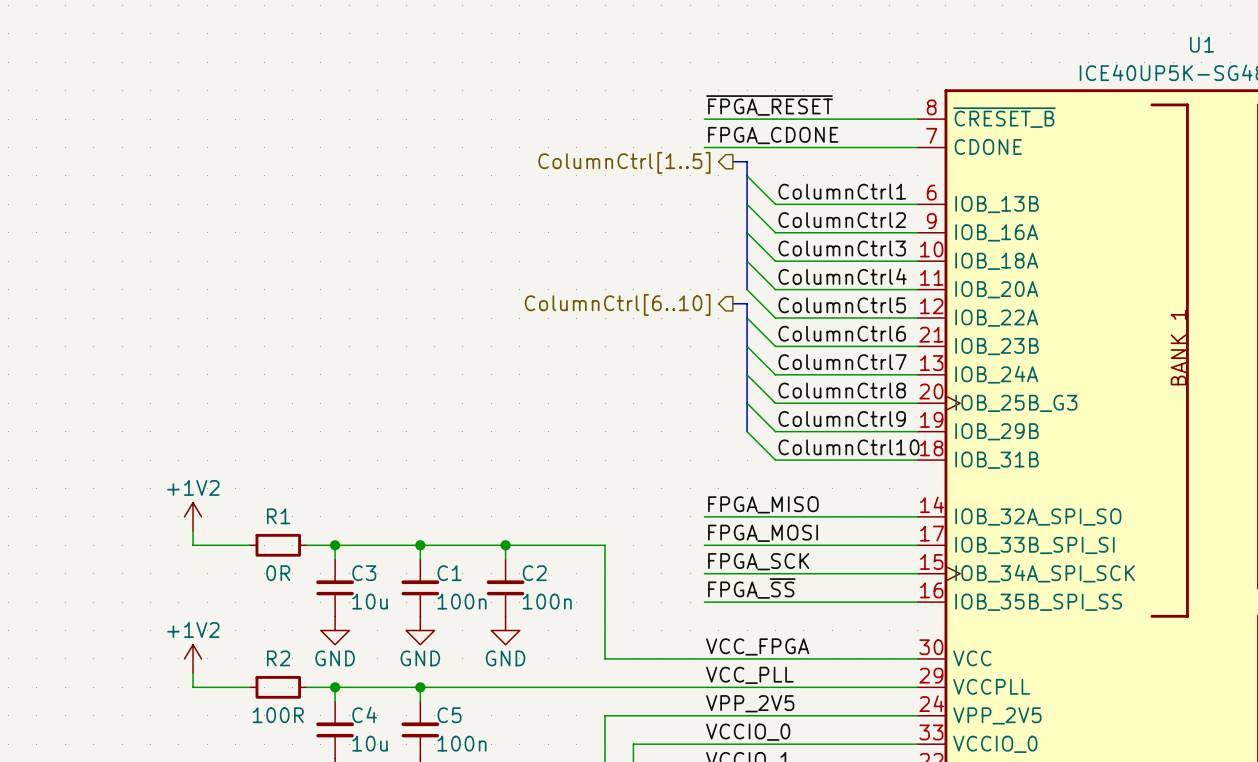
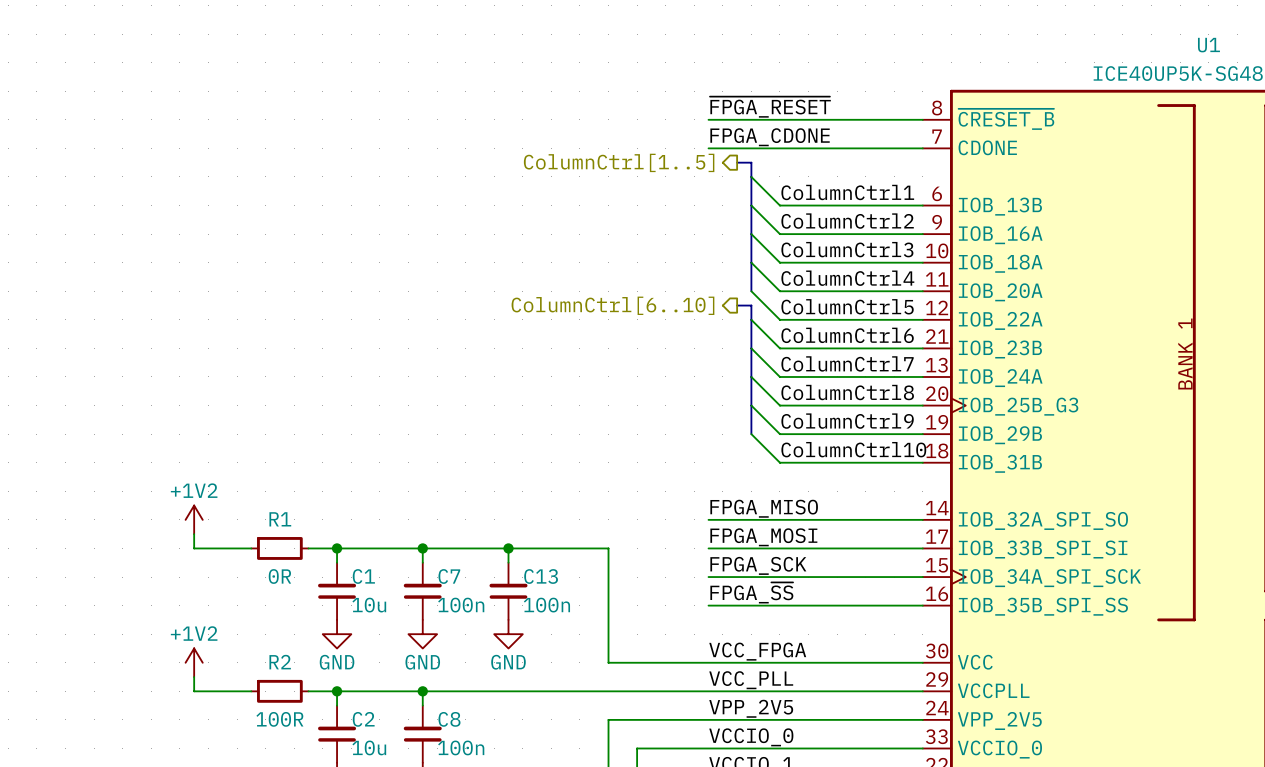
C3 name: C3 (364, 573) -> C1 (363, 576)
C1 name: C1 (449, 573) -> C7 (449, 576)
C2 name: C2 (534, 573) -> C13 (541, 576)
C4 name: C4 (364, 714) -> C2 (363, 719)
C5 name: C5 (449, 715) -> C8 (449, 719)

